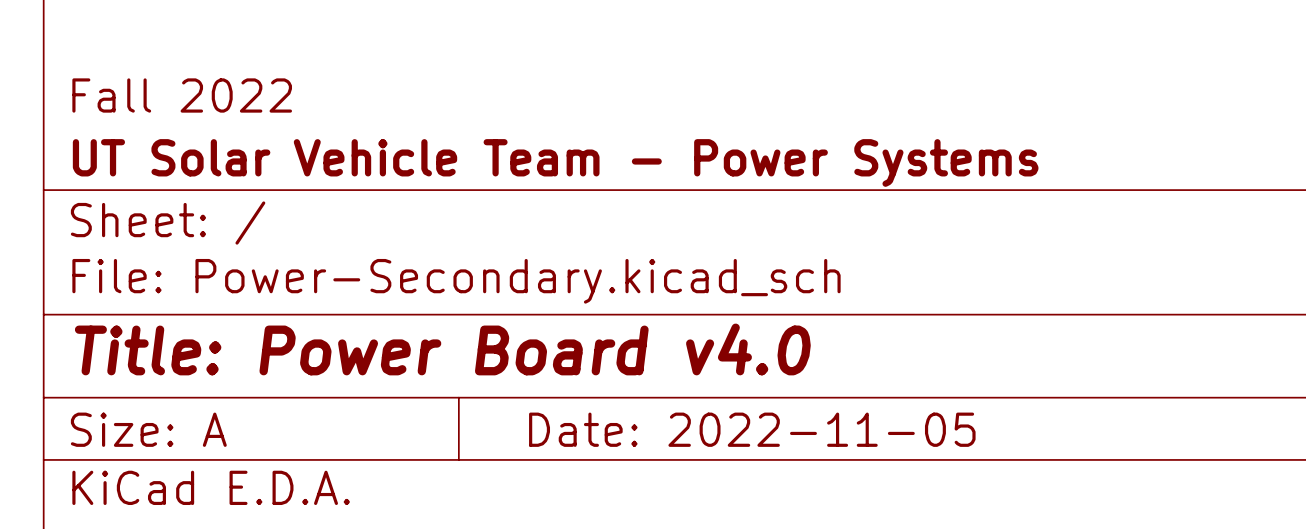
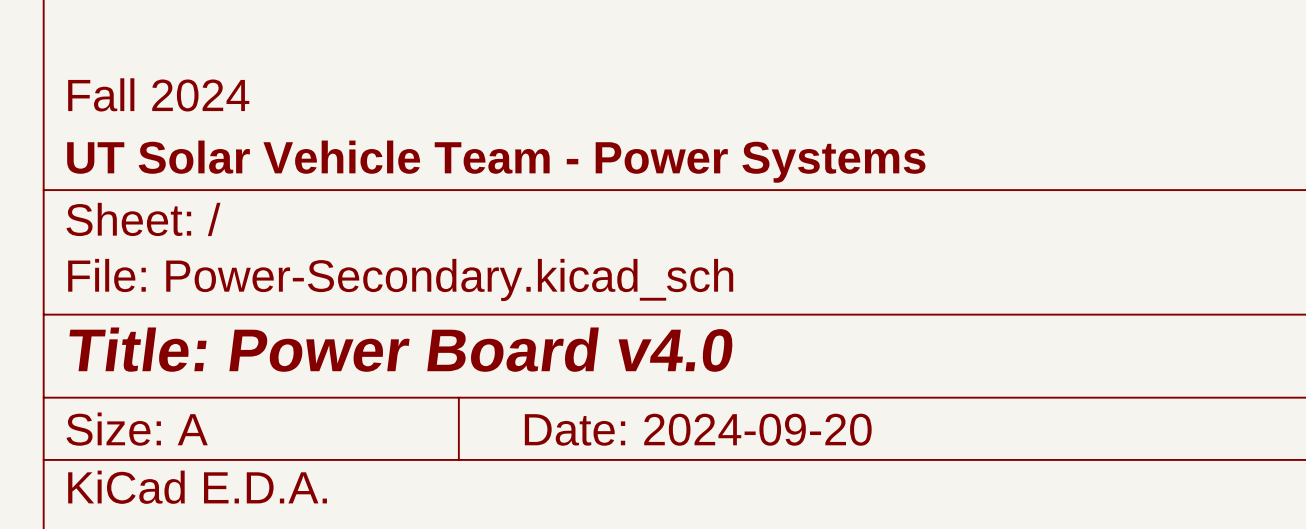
title block: Fall 2022 (182, 95) -> Fall 2024 (158, 94)
title block: Date: 2022-11-05 (752, 429) -> Date: 2024-09-20 (698, 429)

